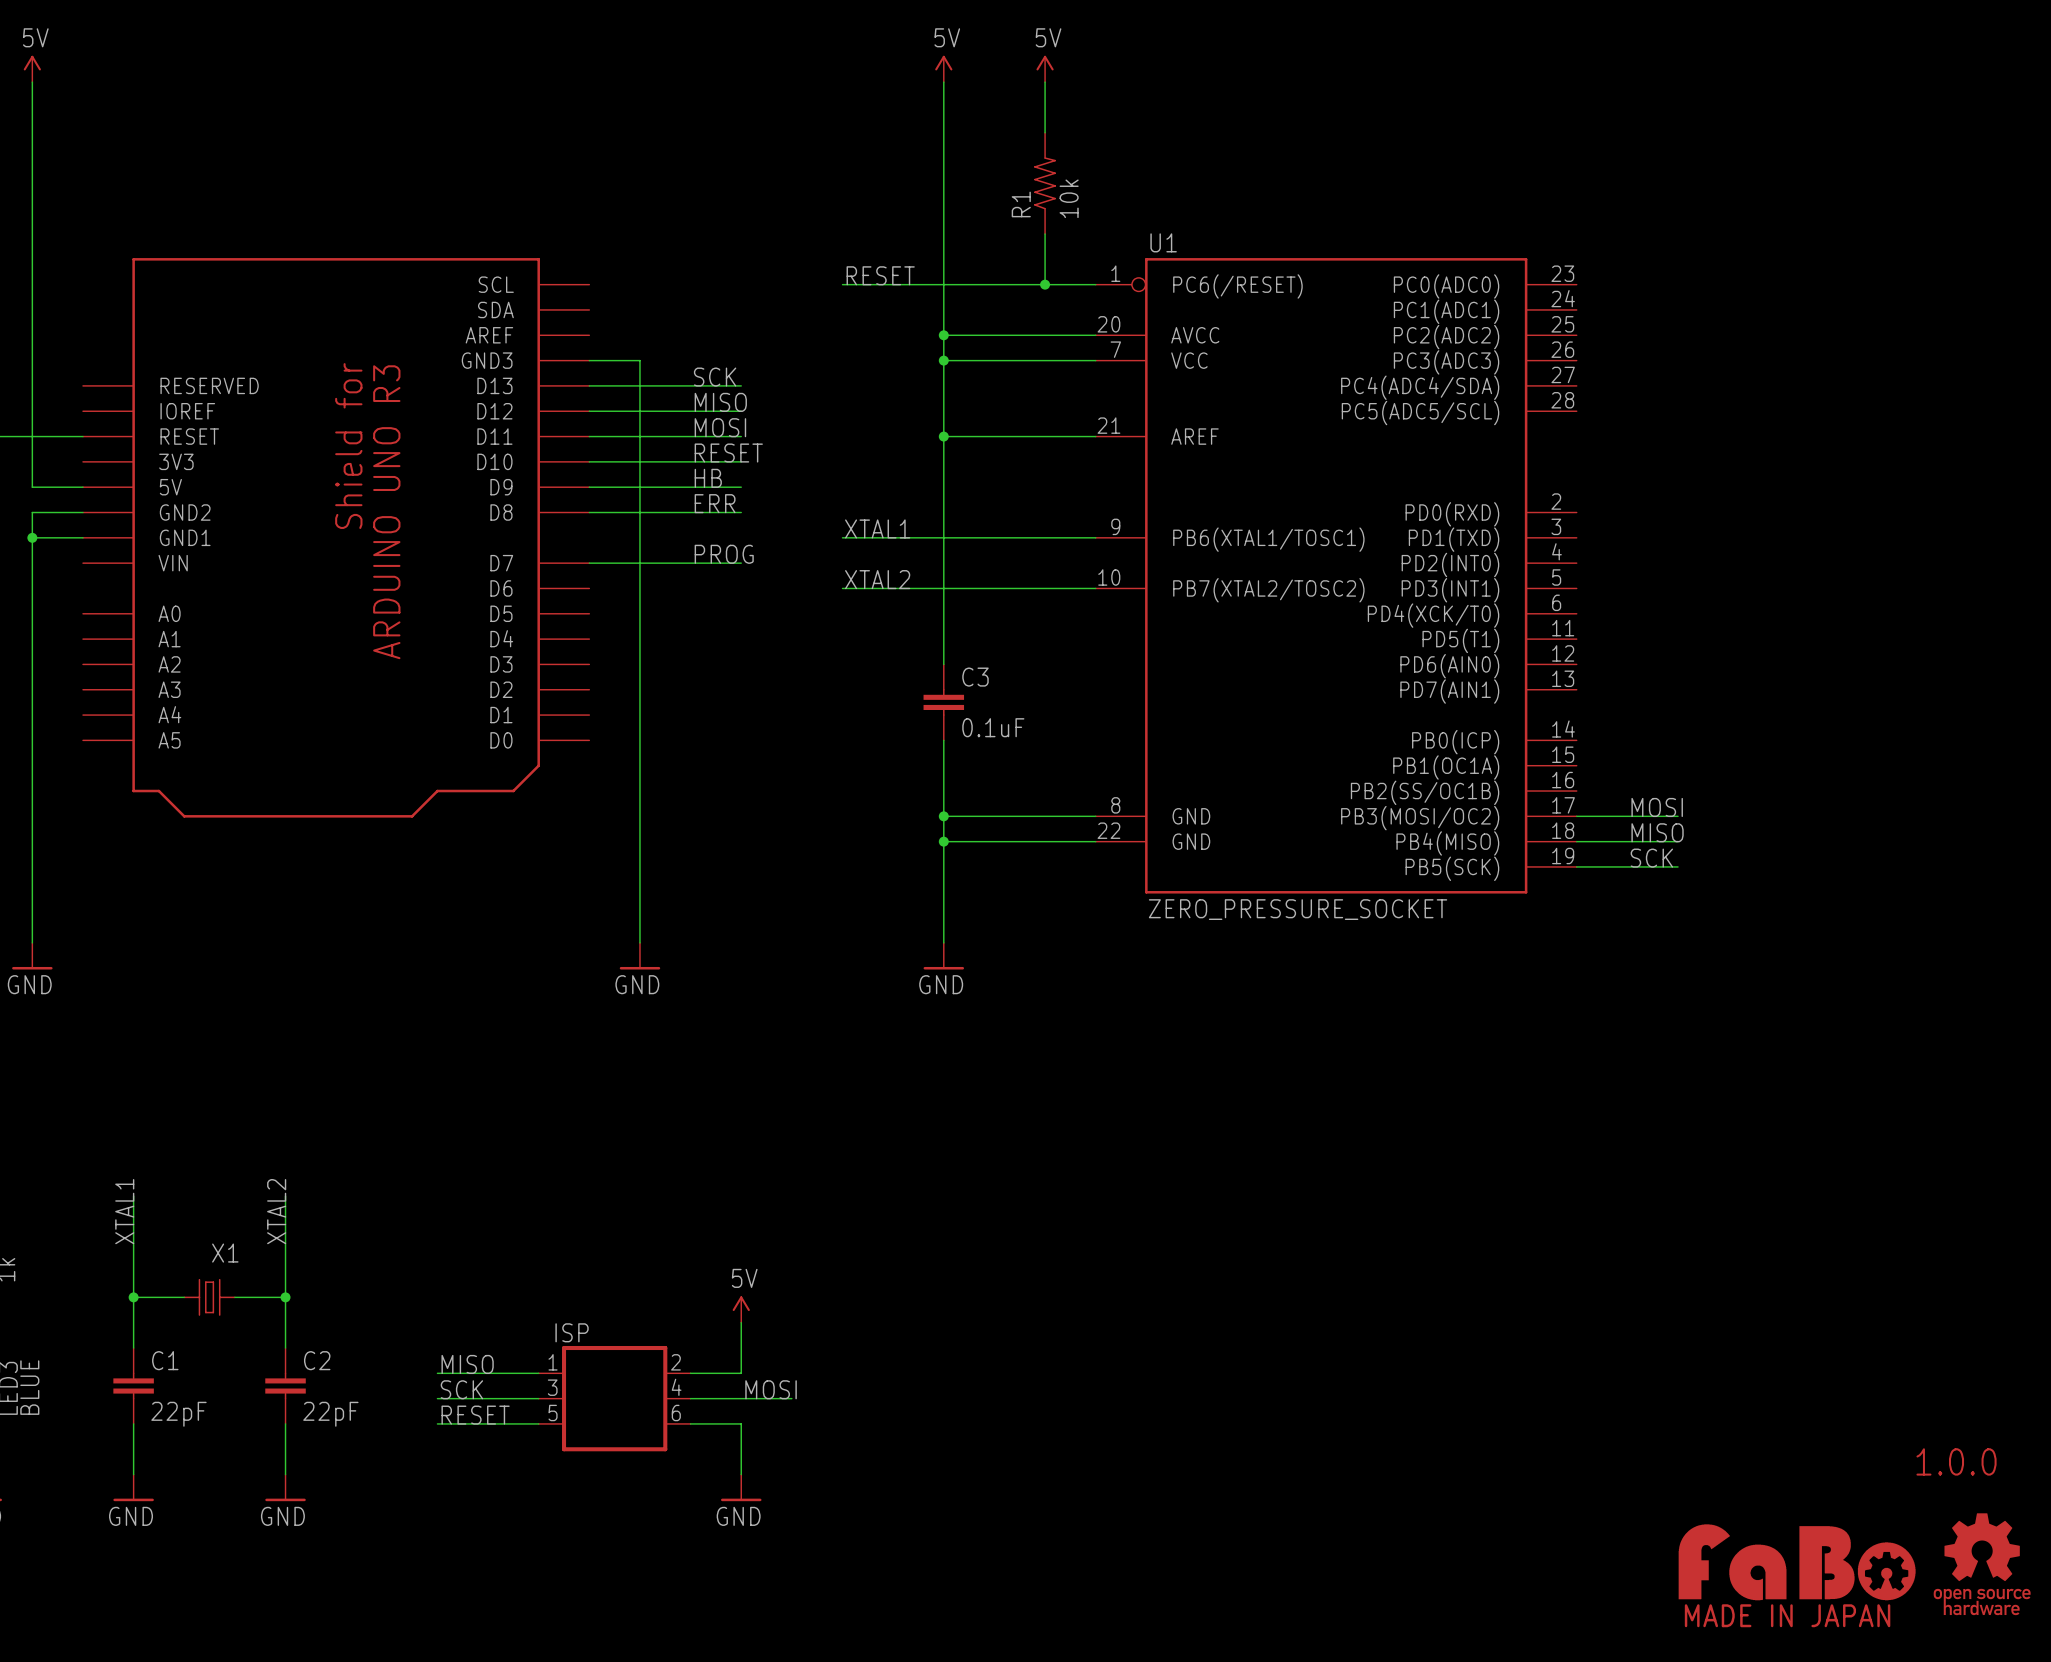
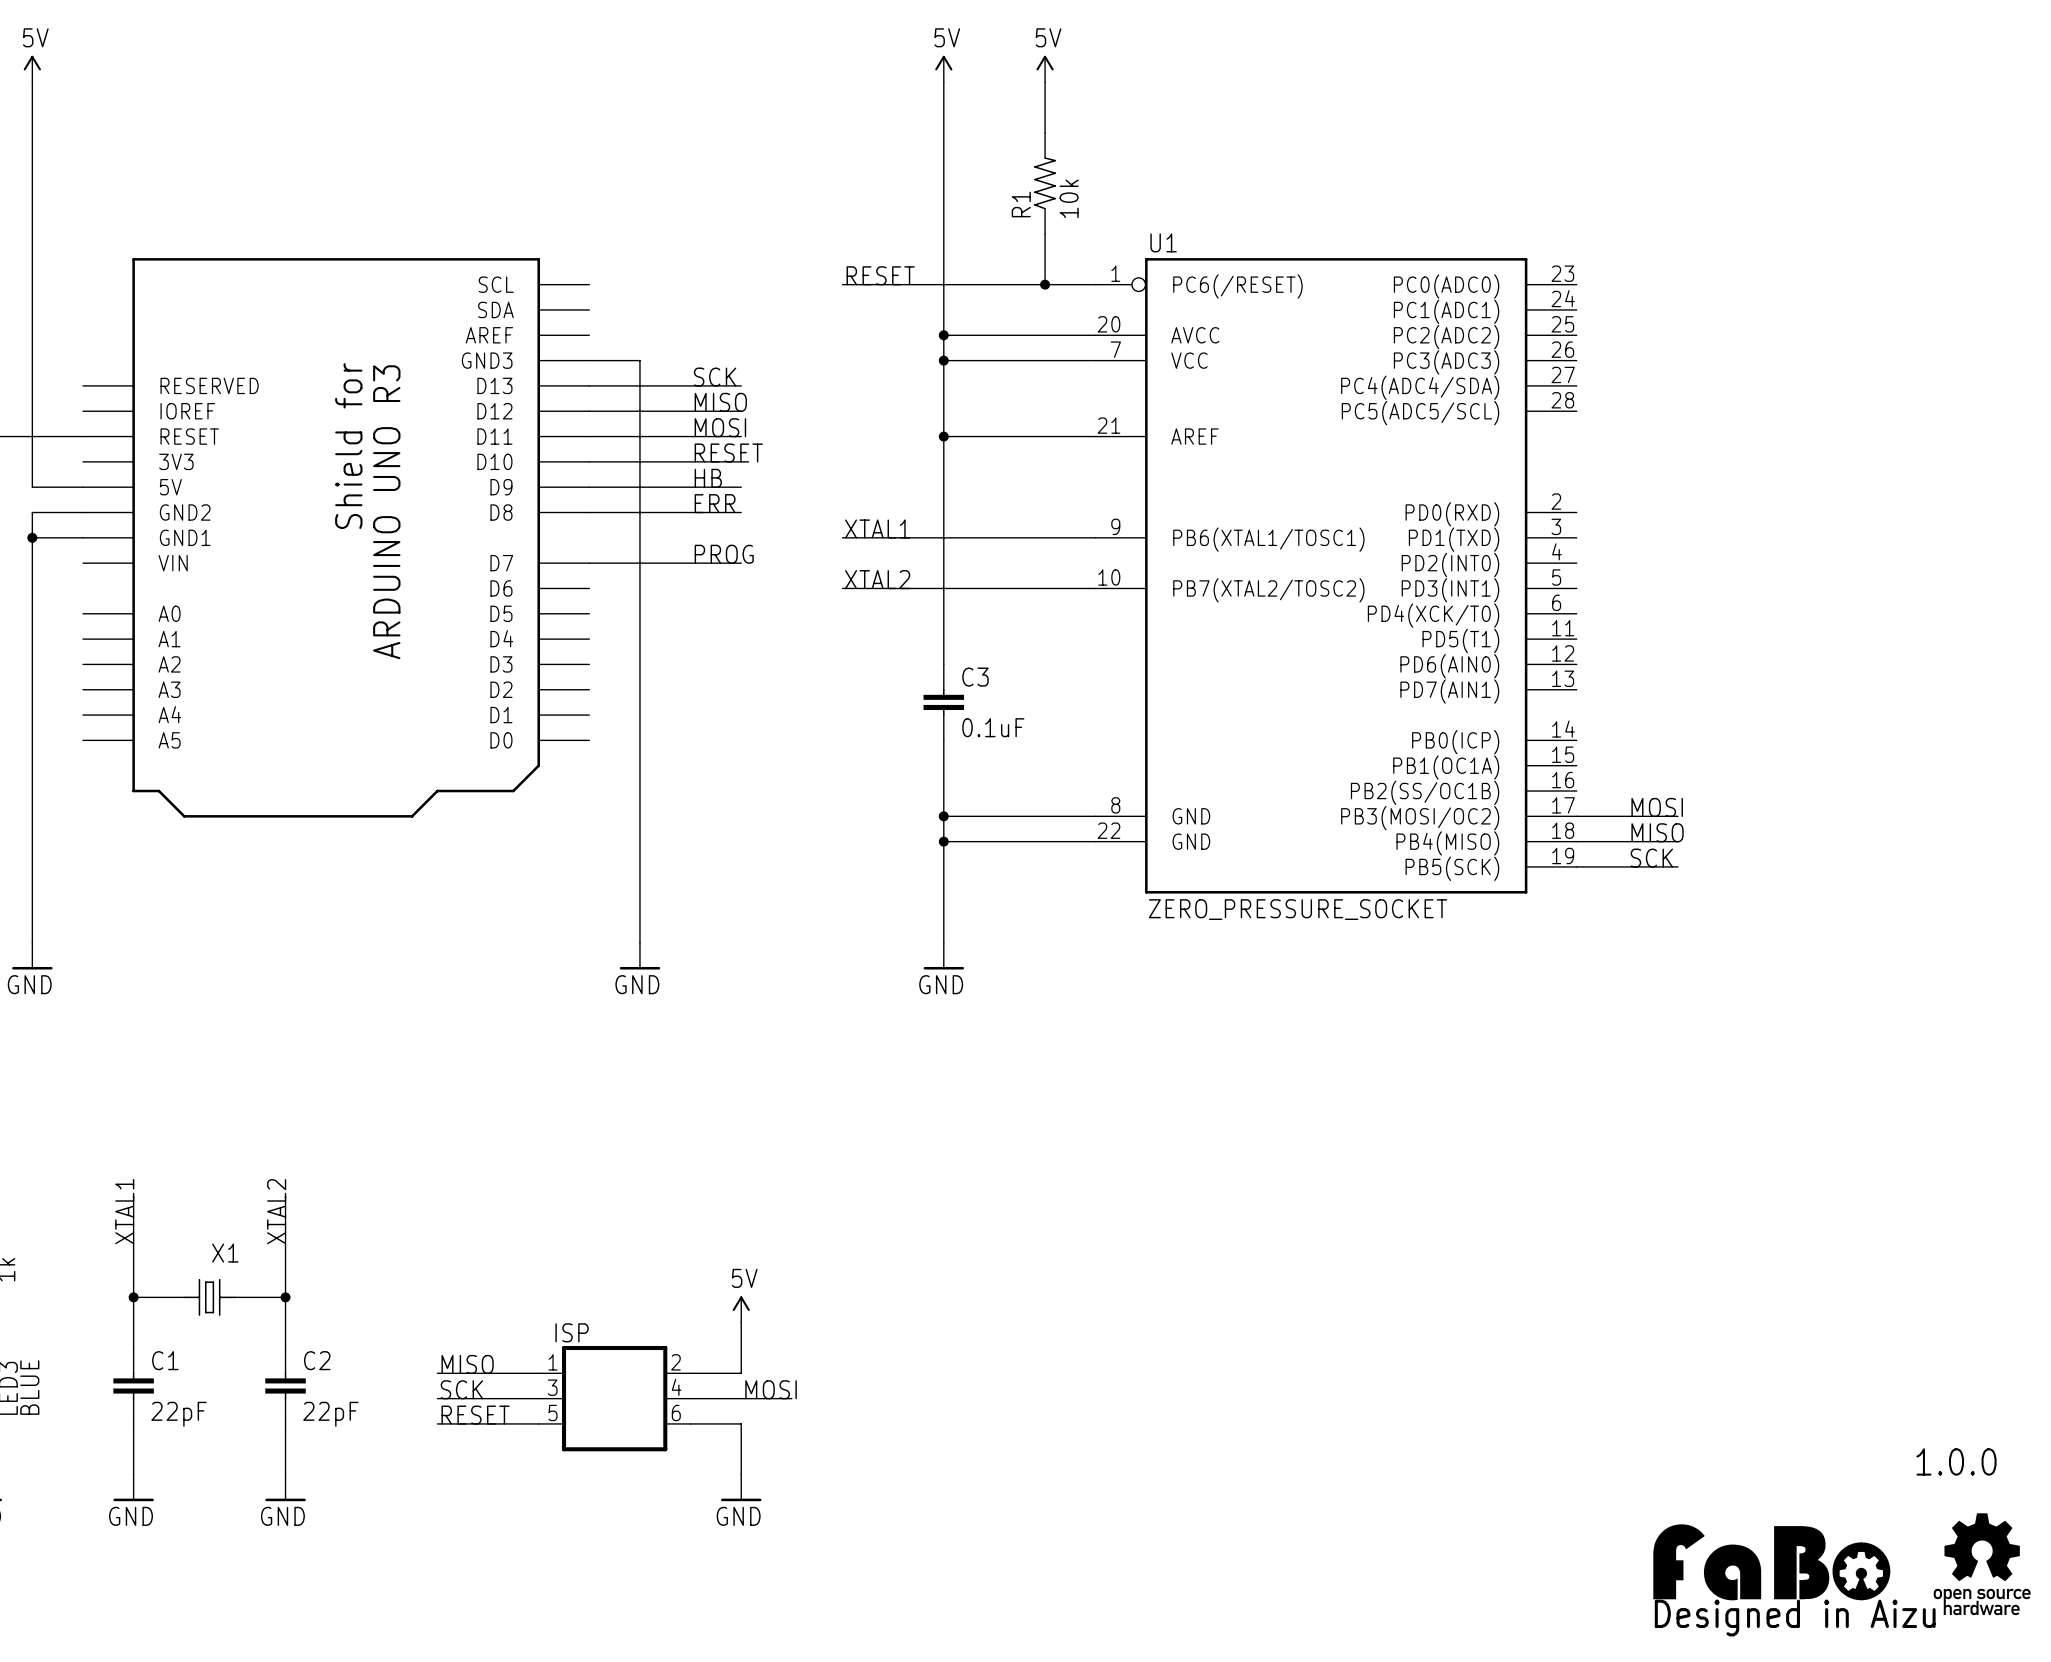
part: none -> (1771, 1562)
part: (1797, 1562) -> none

